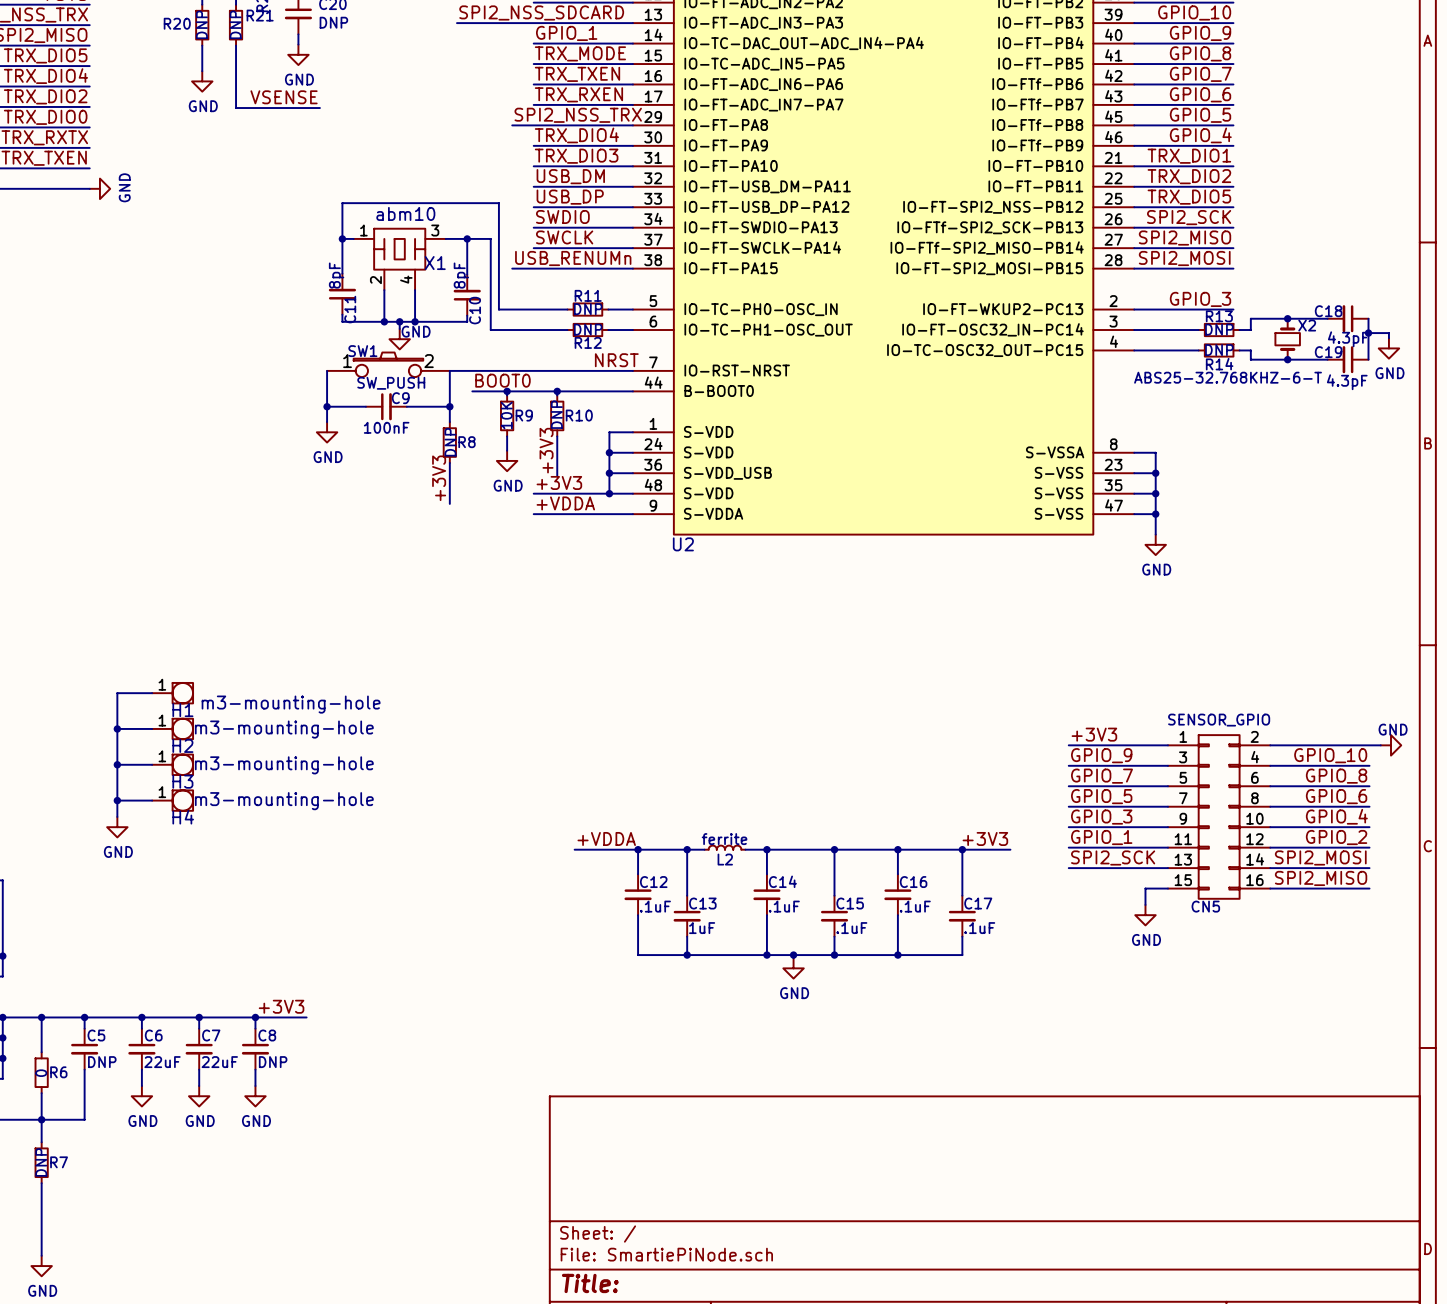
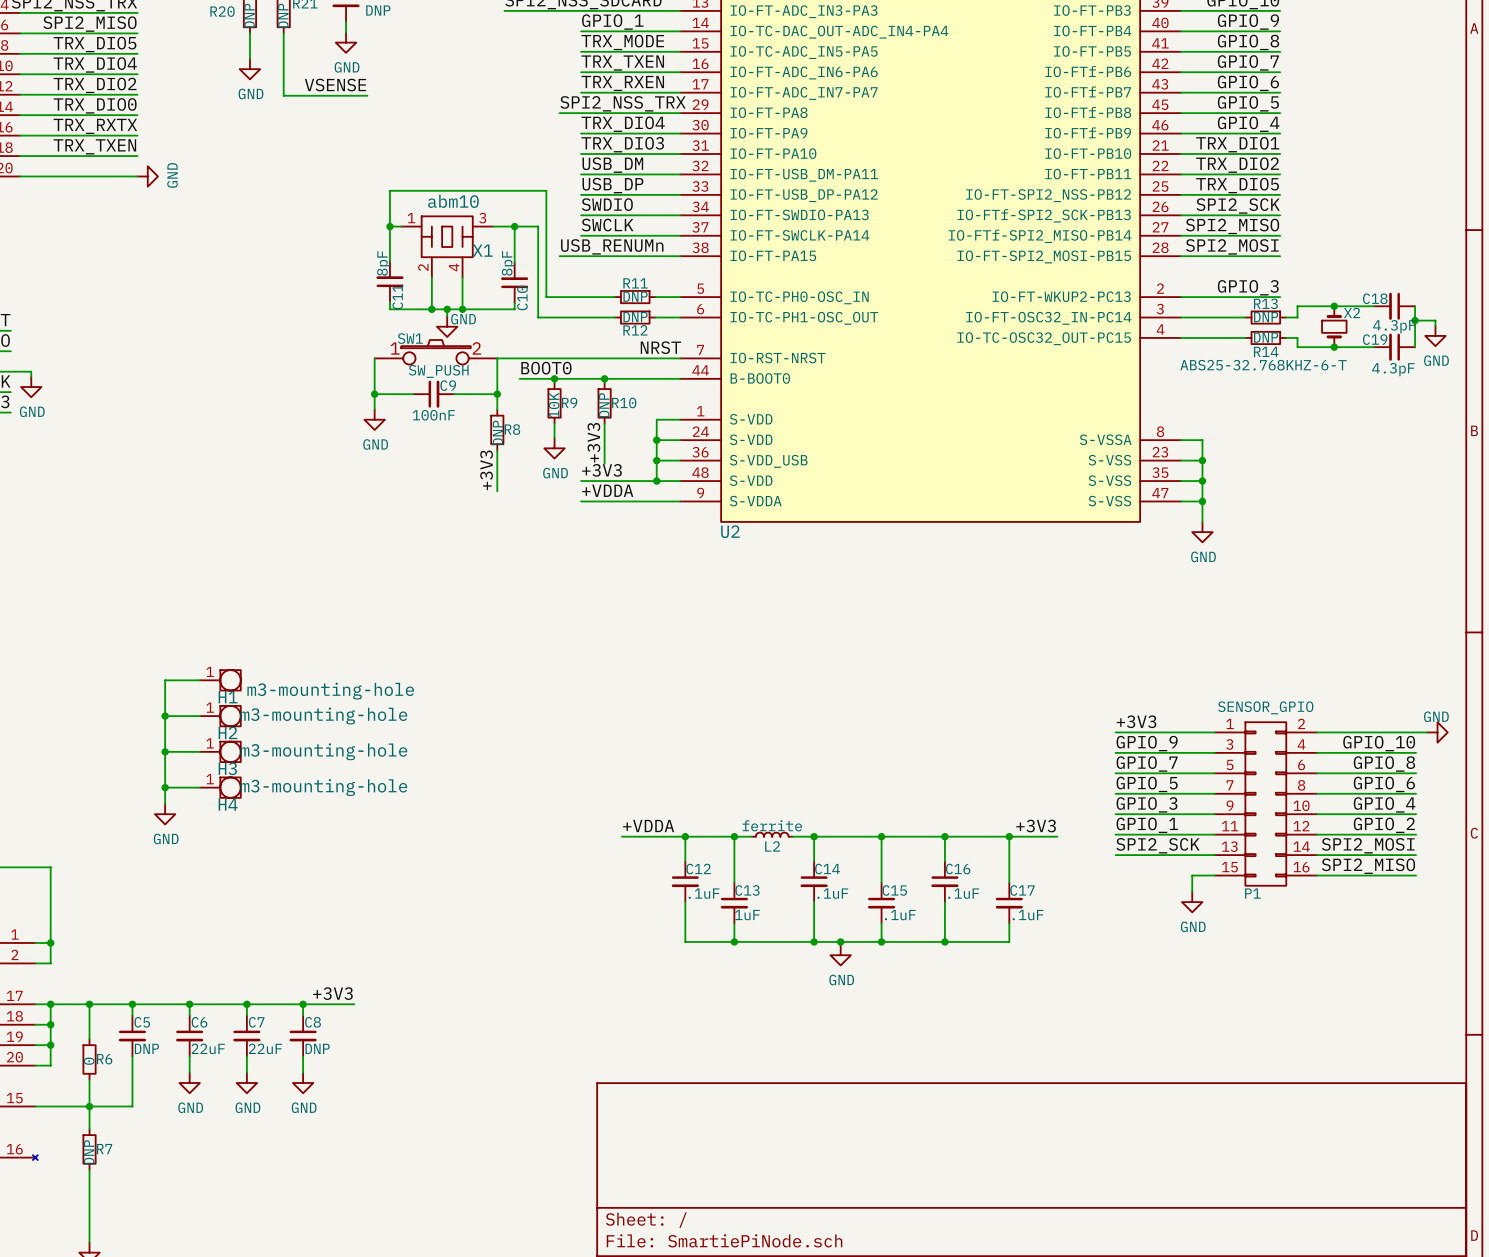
CN5 name: CN5 (1205, 906) -> P1 (1252, 893)

